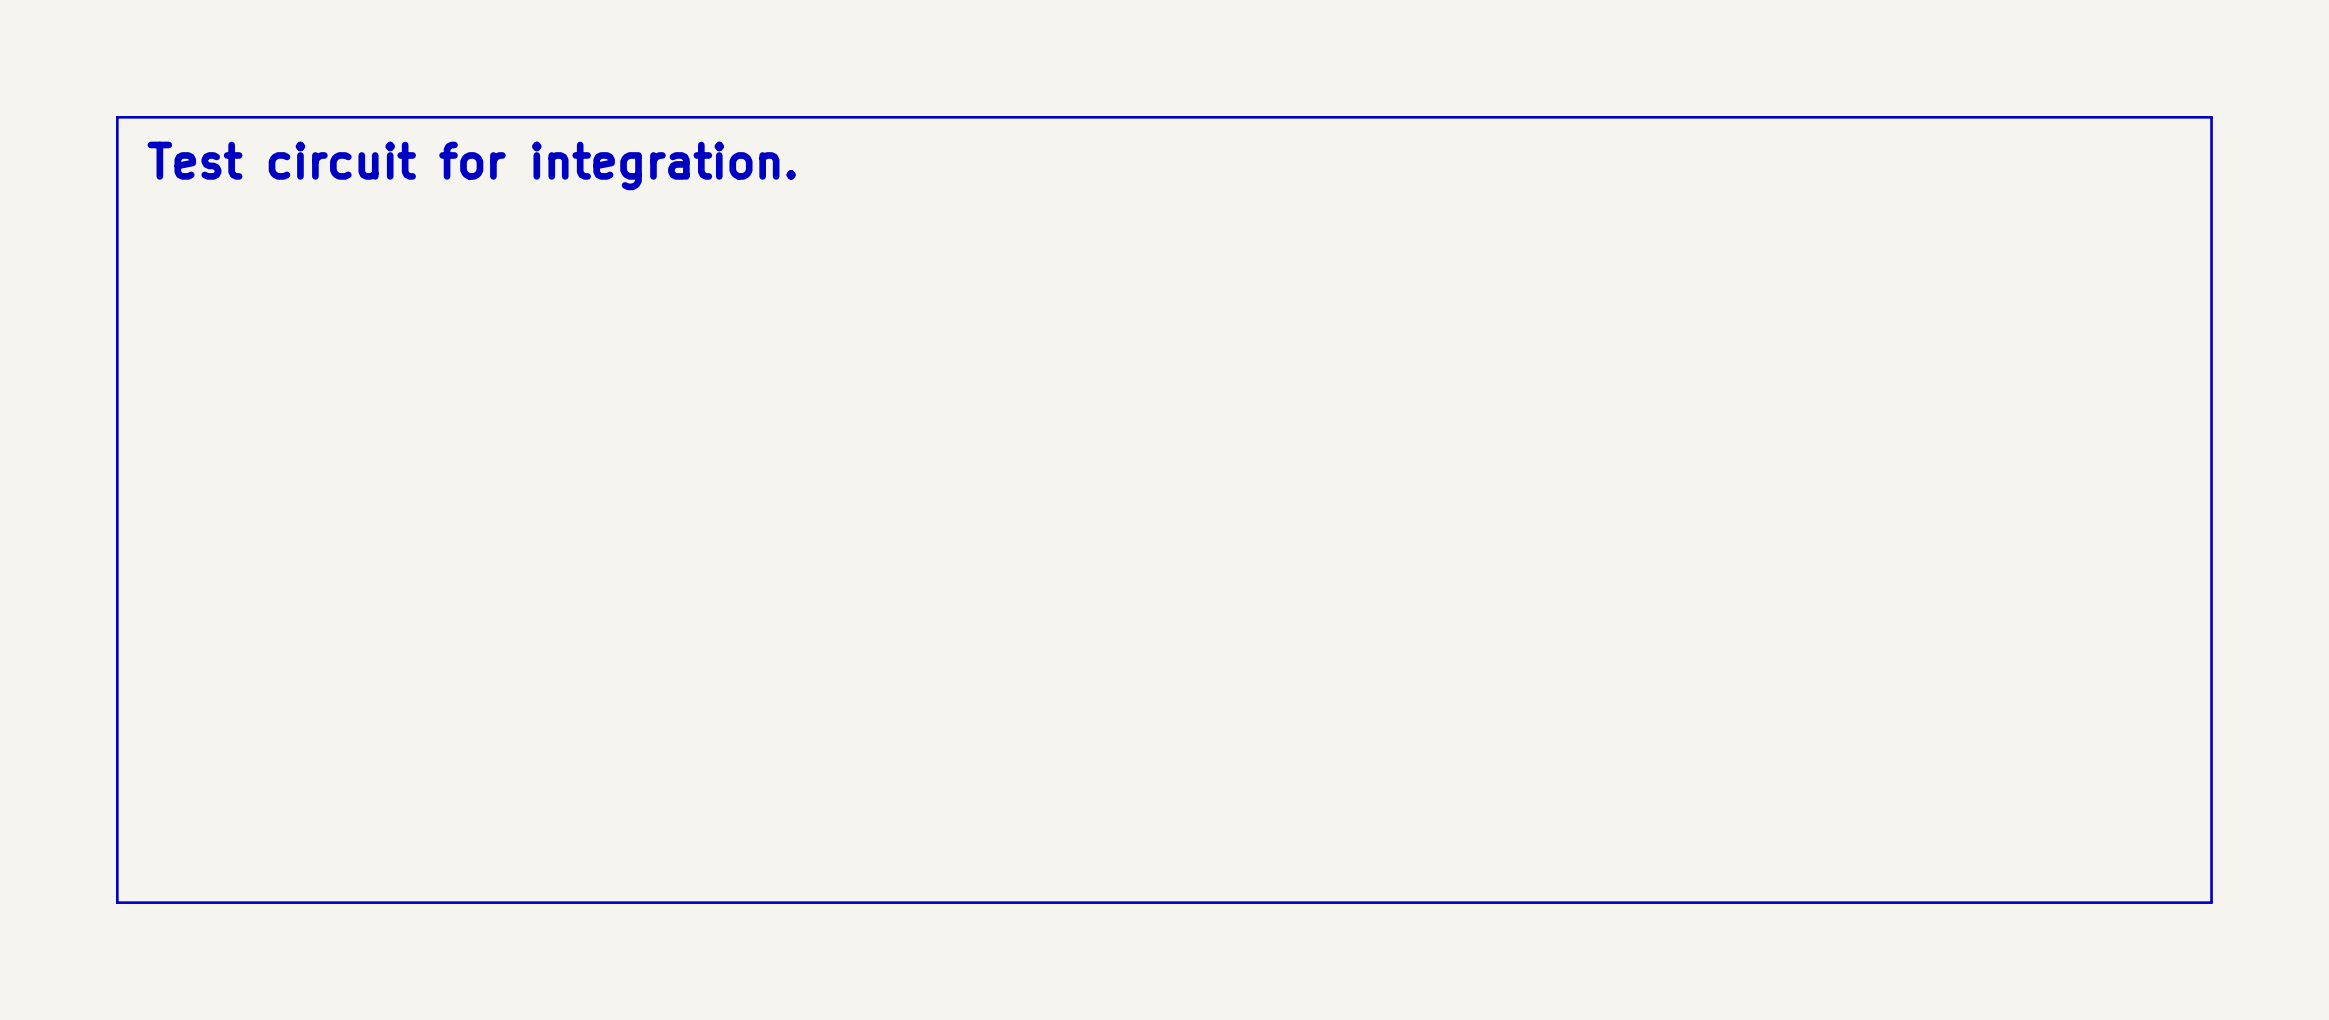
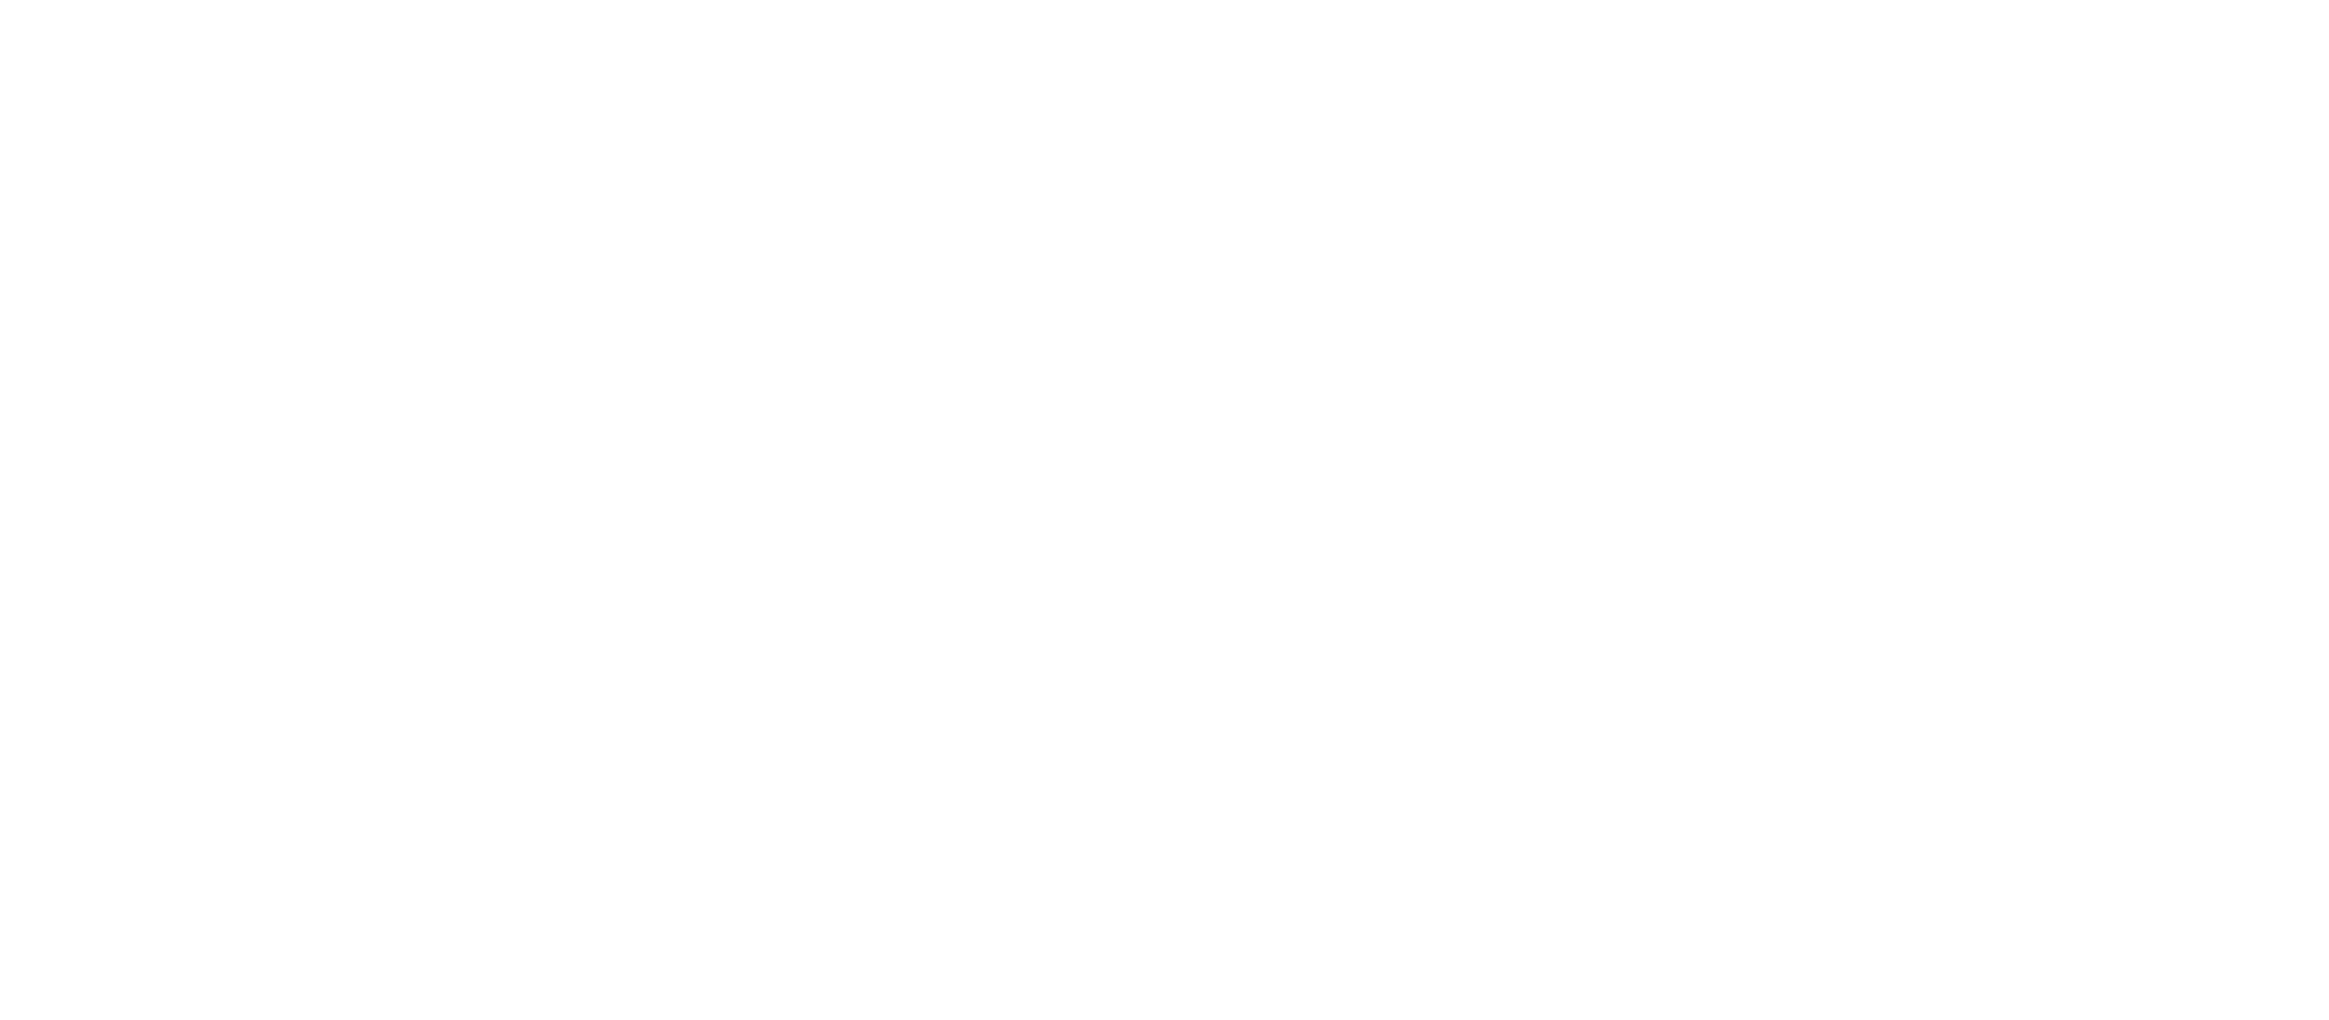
line: (117, 117) (2211, 117) (2211, 902) (117, 902) (117, 117) -> none
text: Test circuit for integration. (471, 165) -> none

